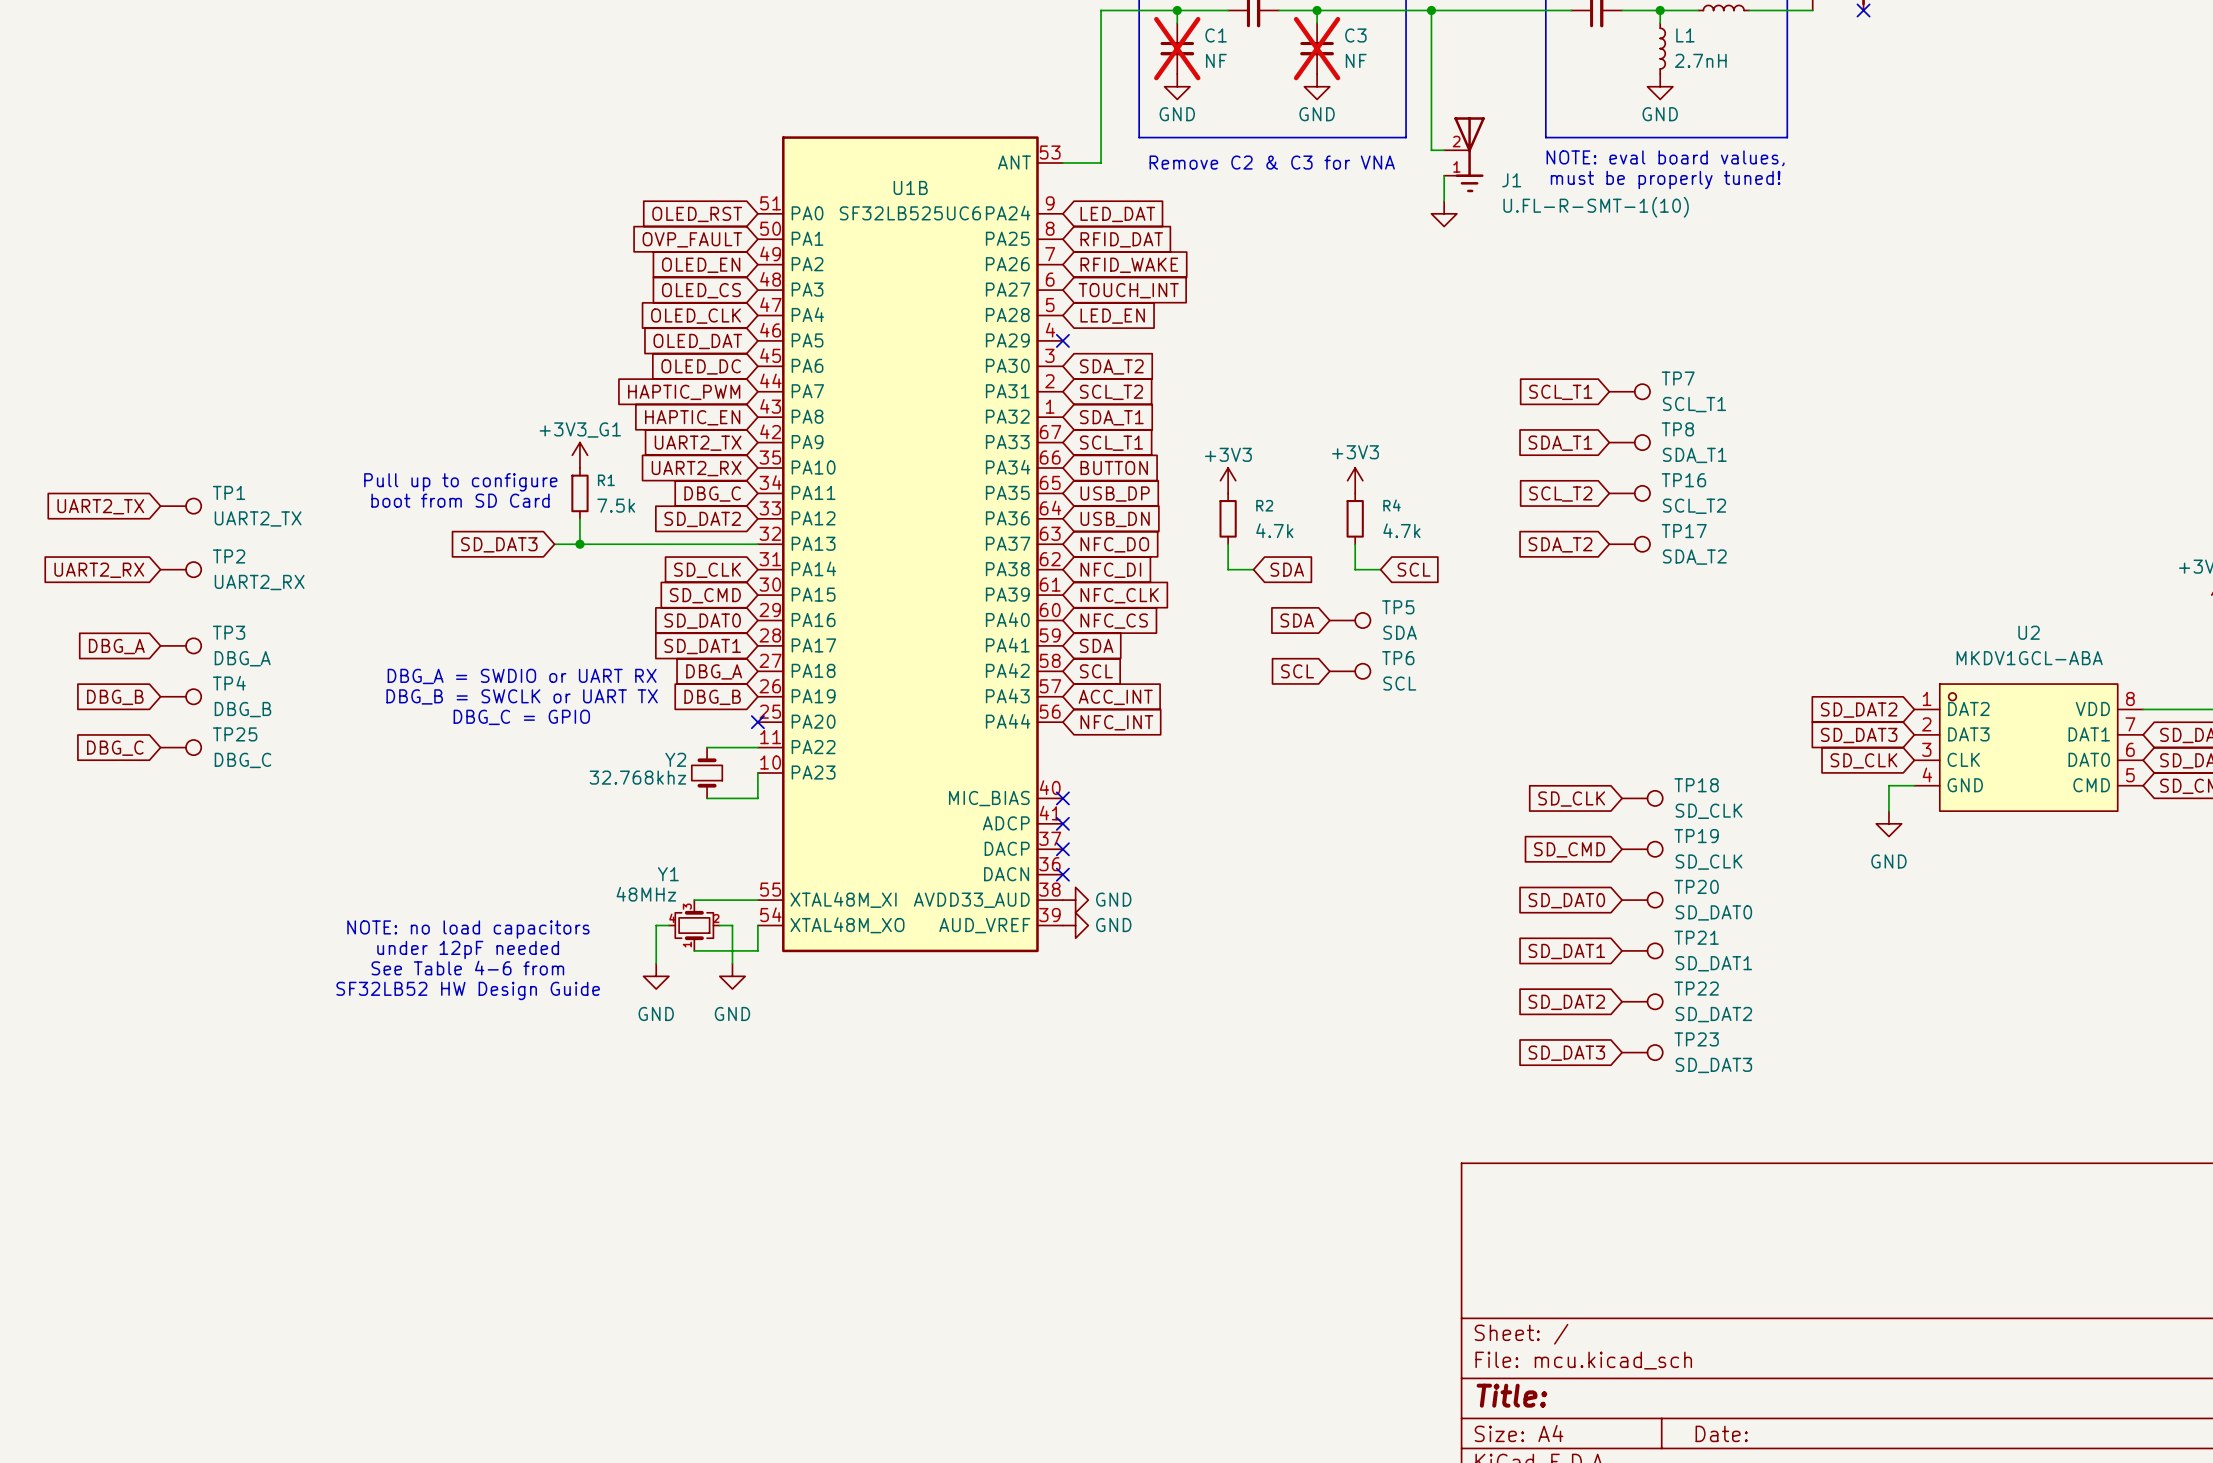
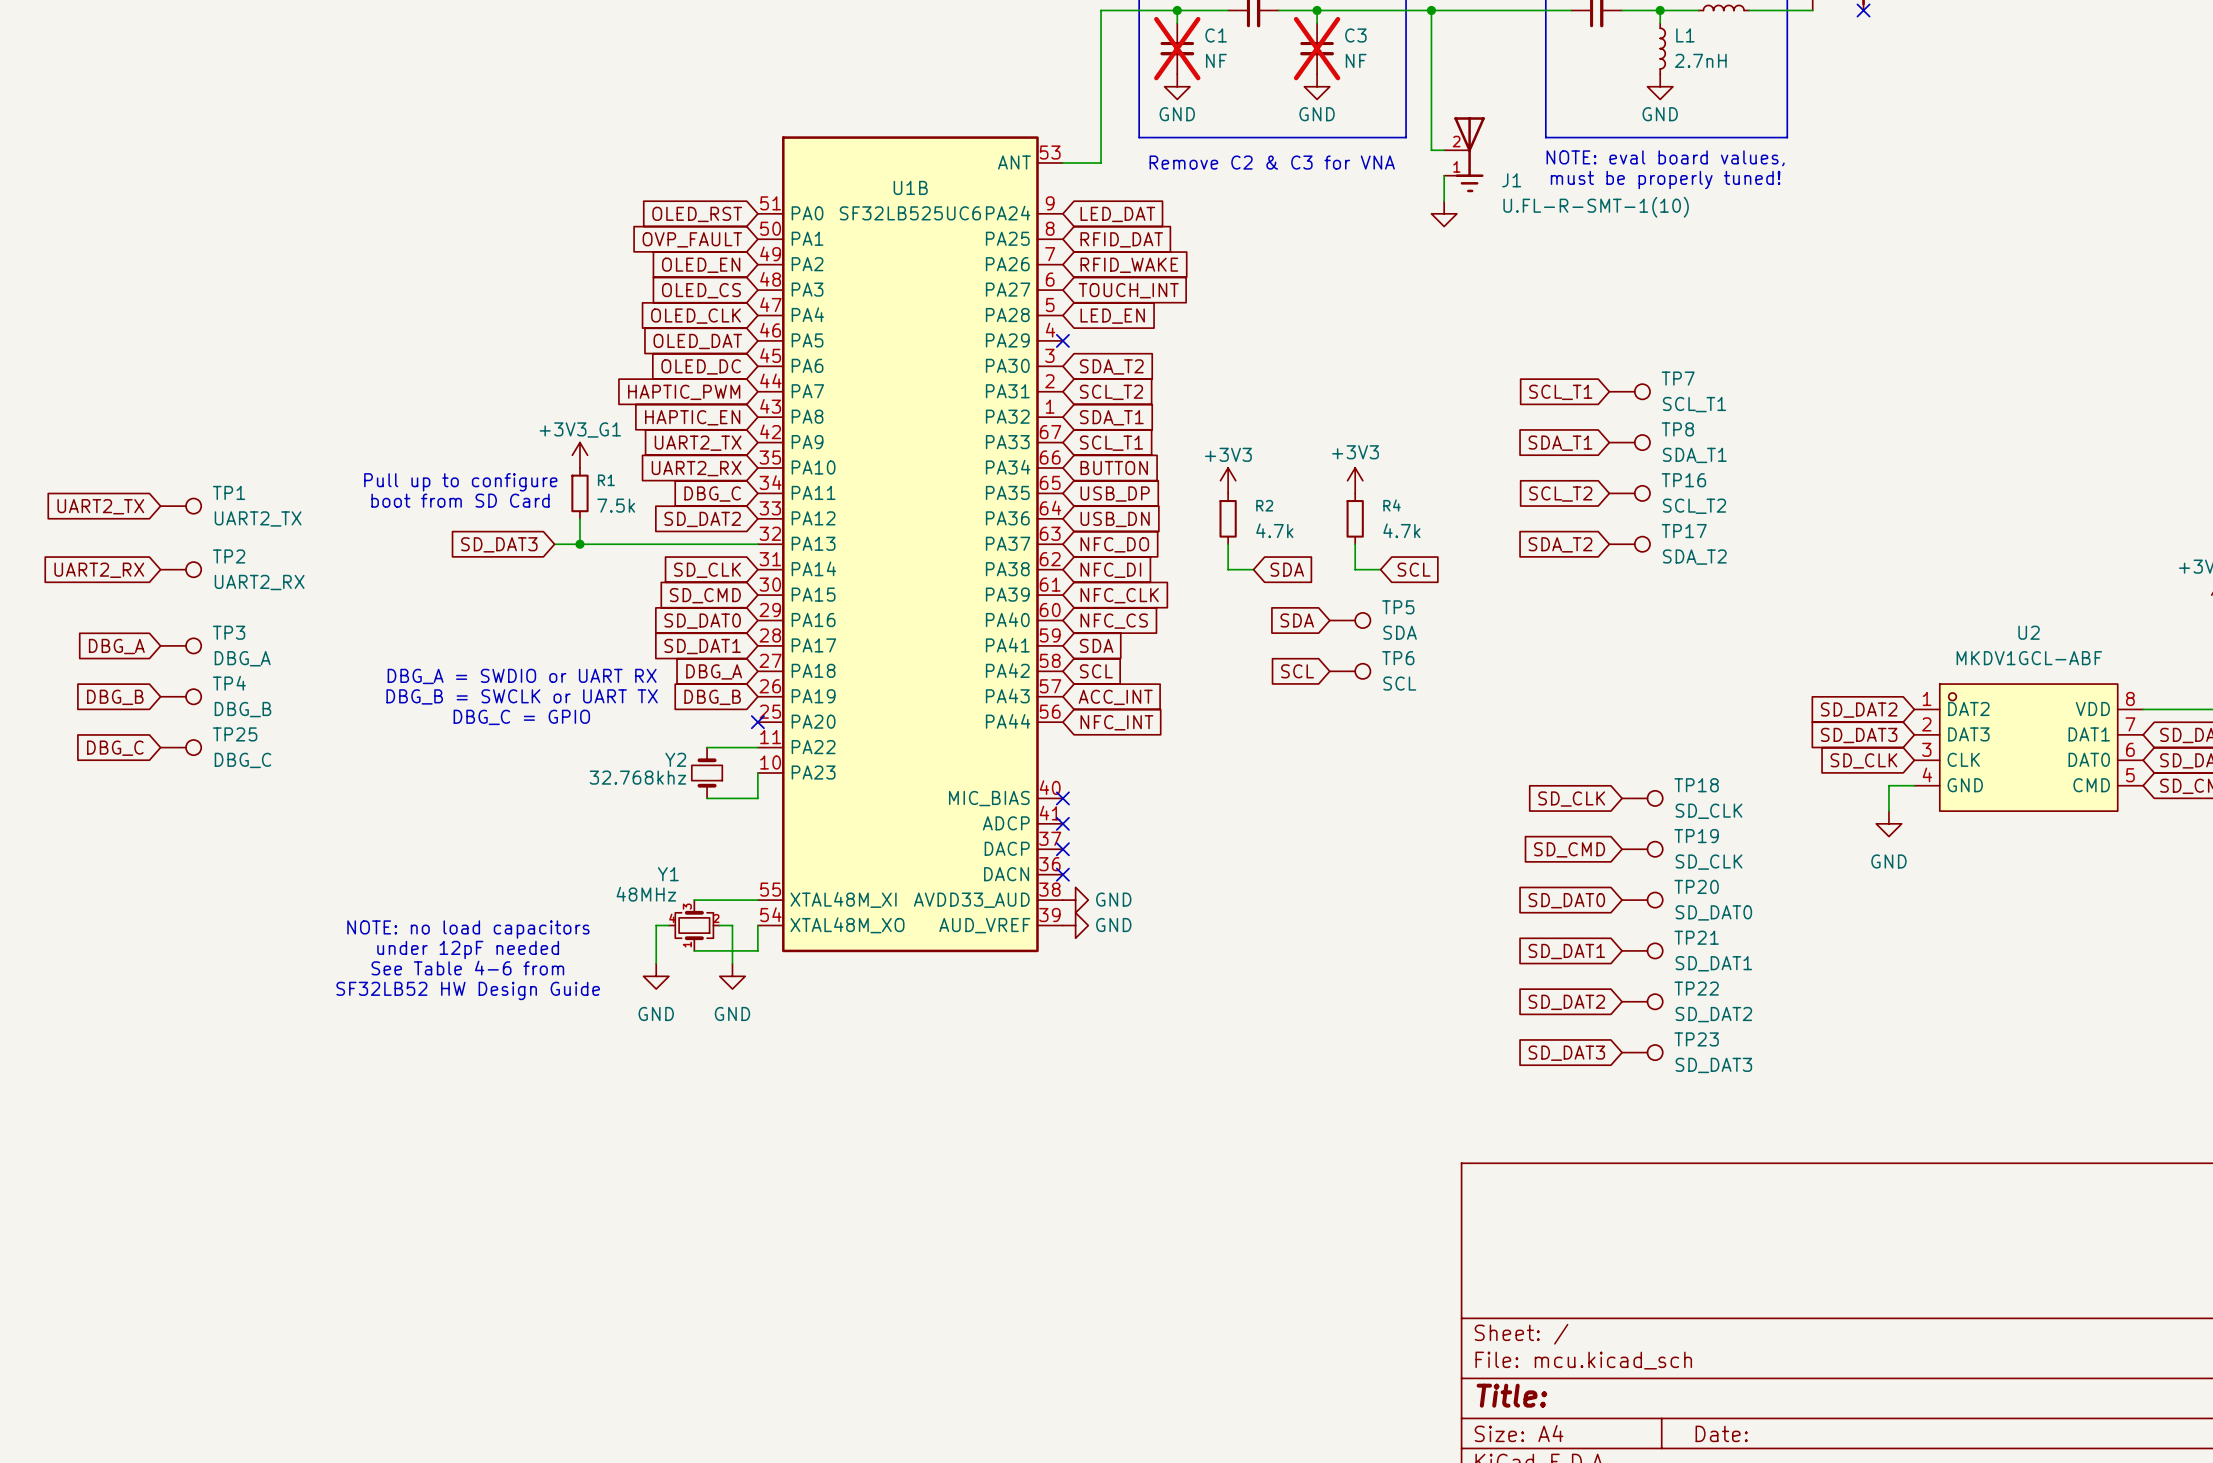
U2 value: MKDV1GCL-ABA (2029, 658) -> MKDV1GCL-ABF (2029, 658)

